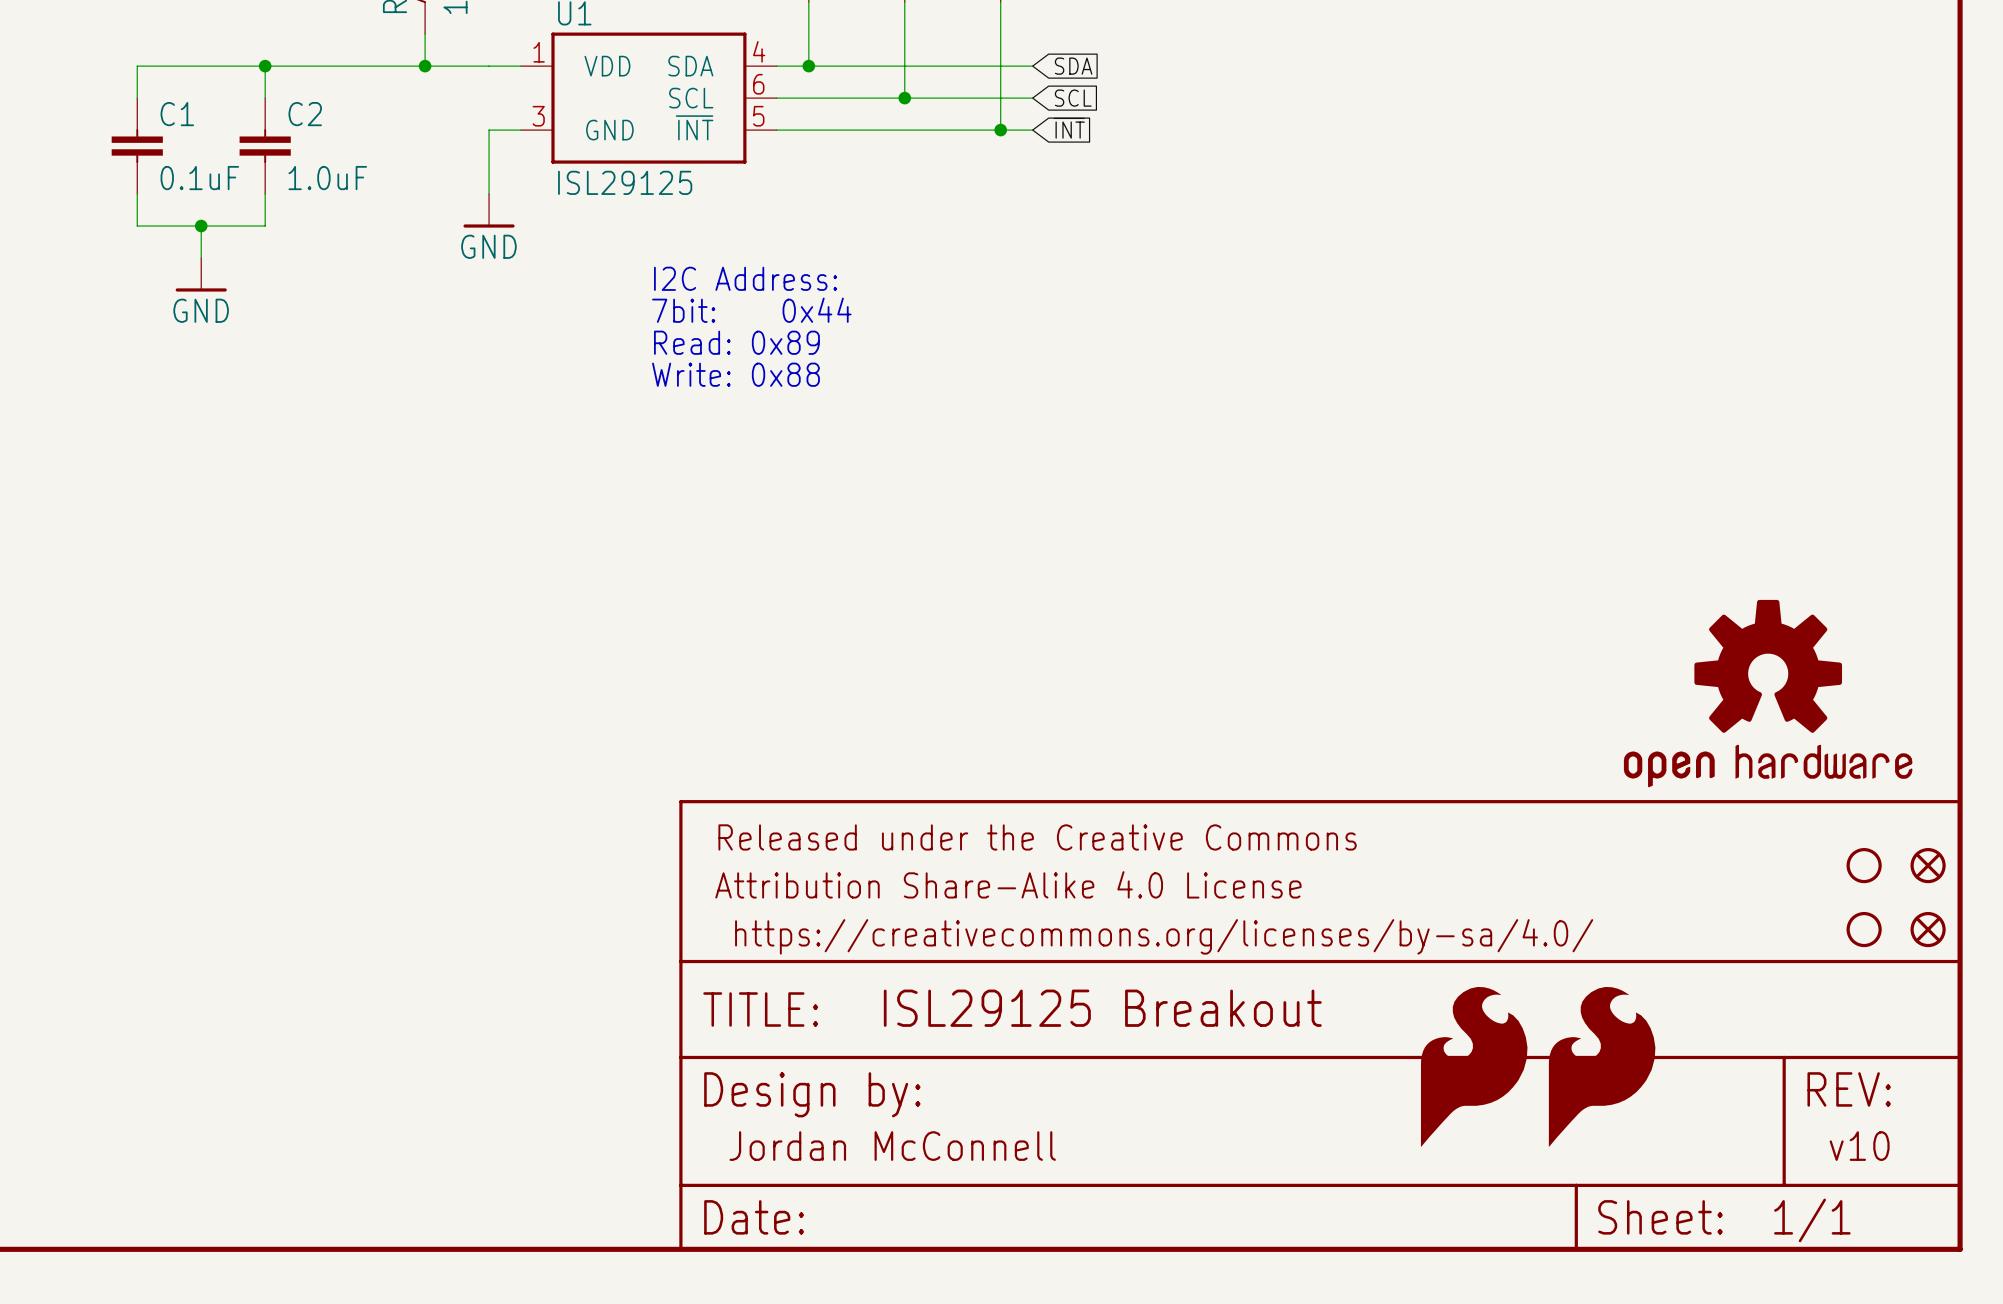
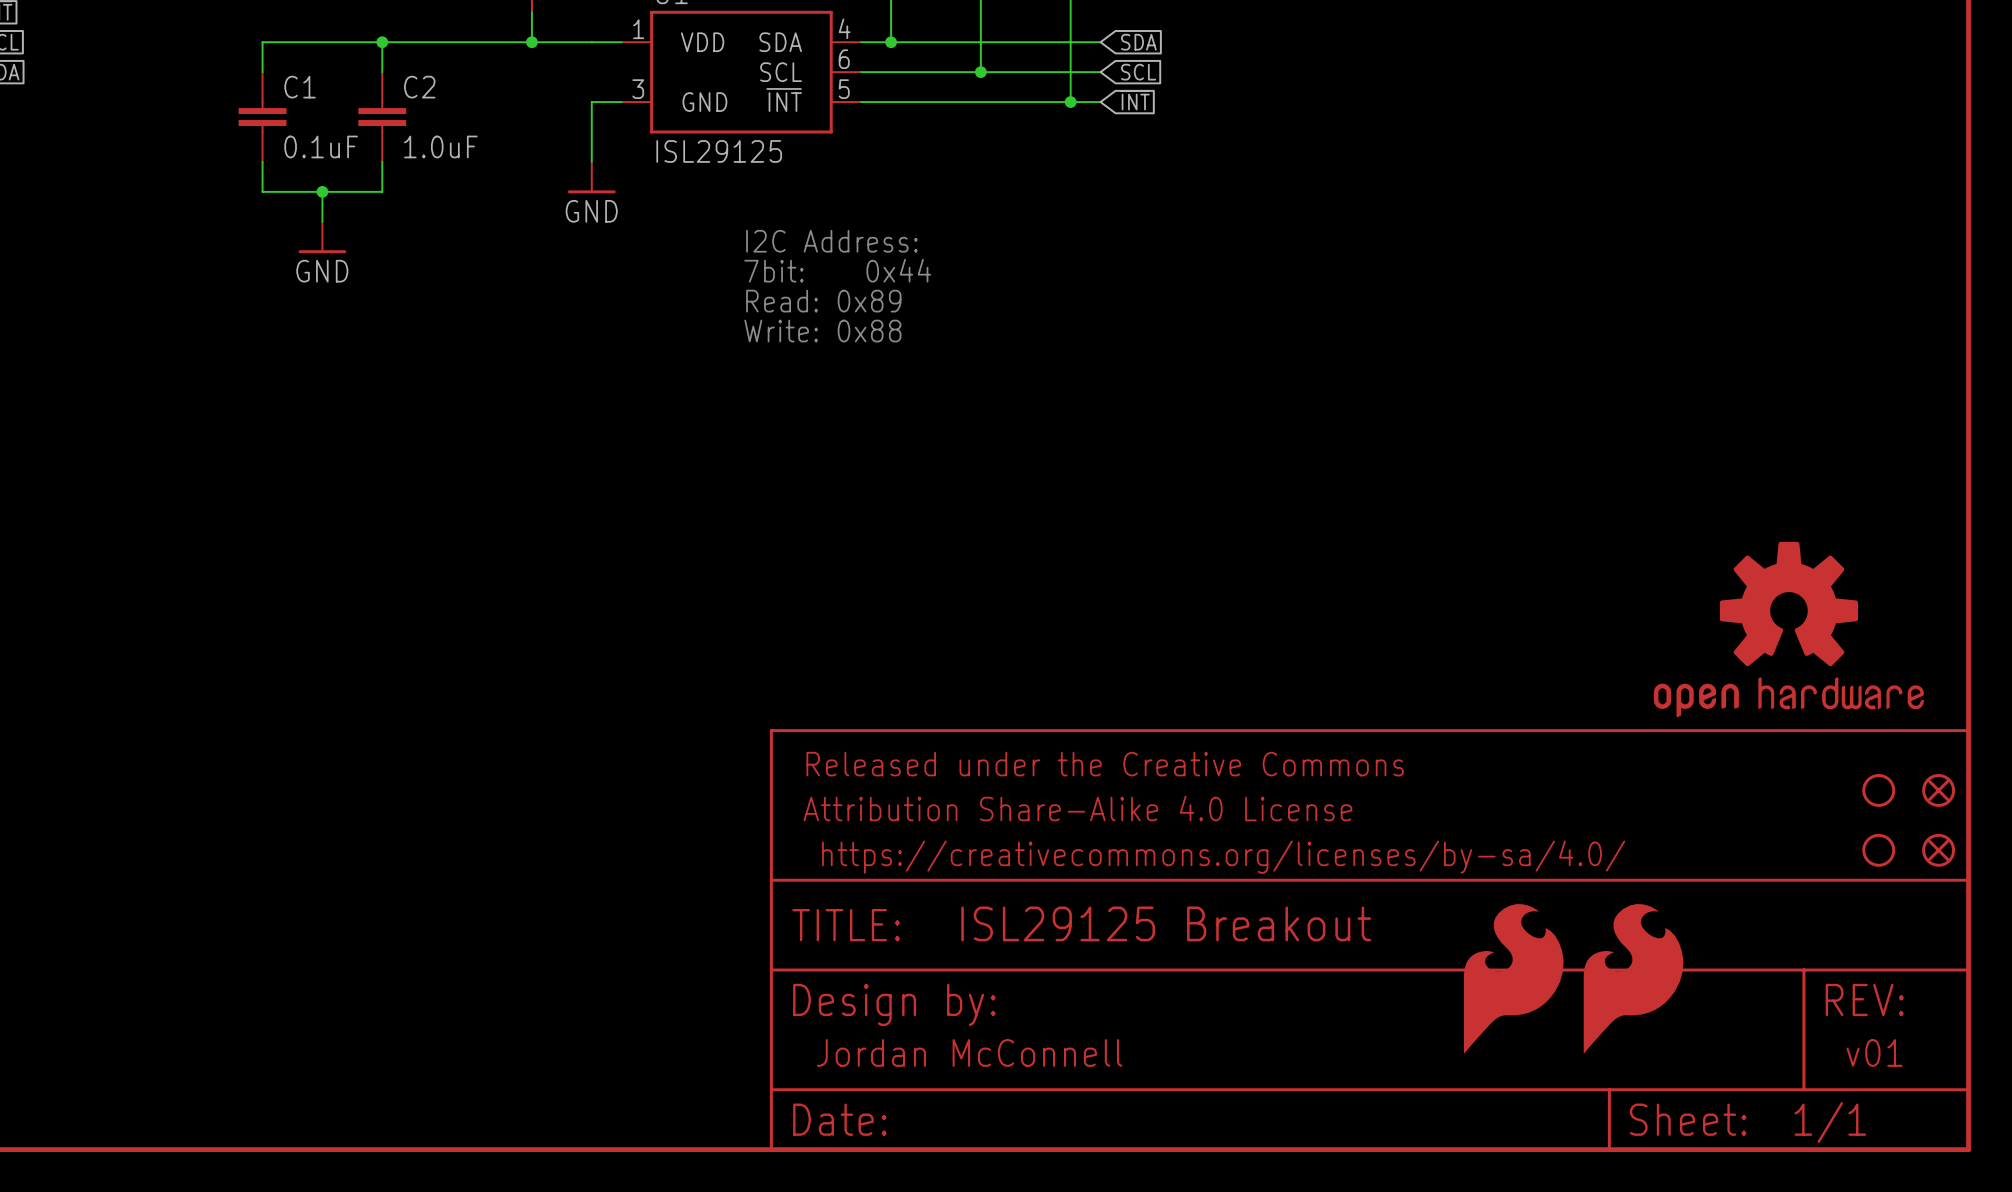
text: v10 (1859, 1146) -> v01 (1874, 1052)

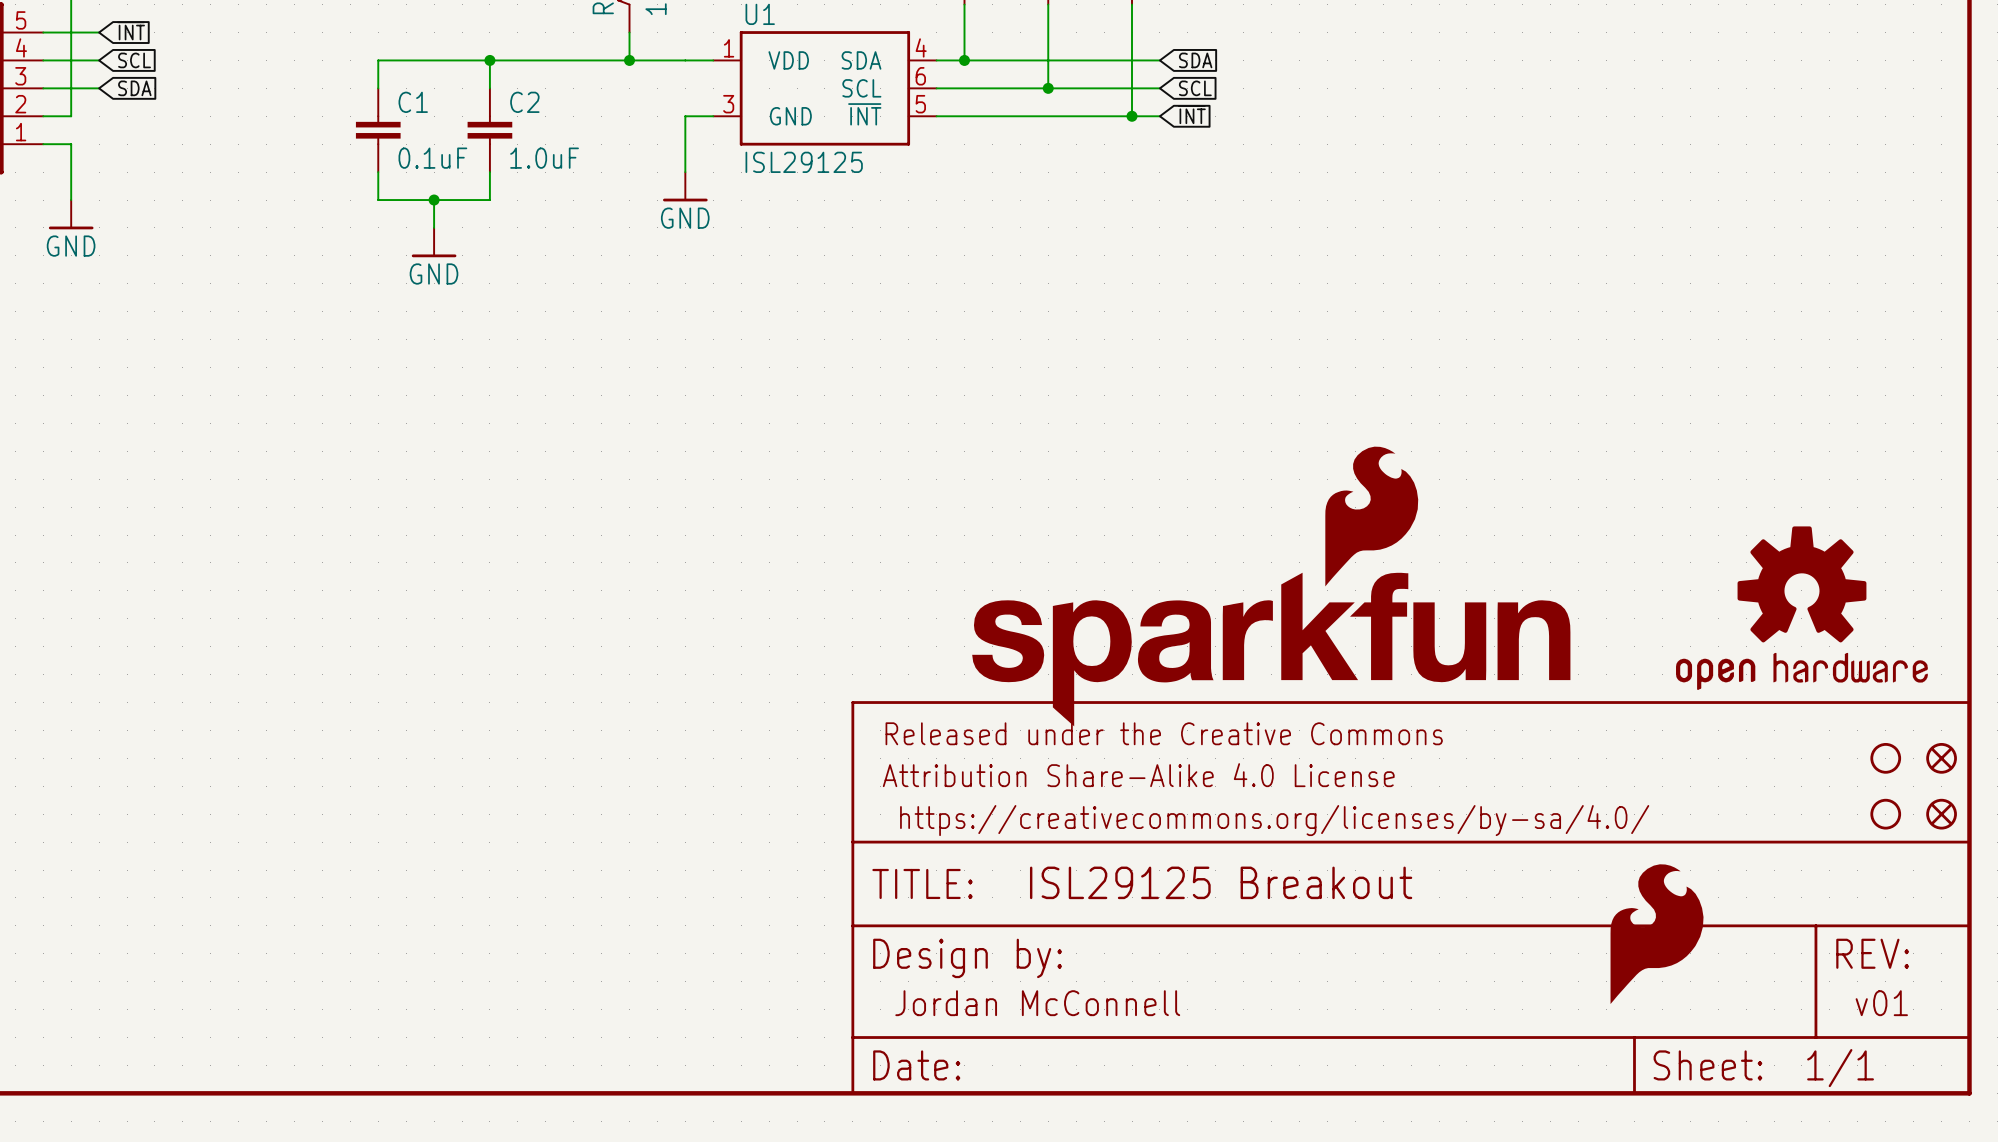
text: I2C Address: (831, 241) -> none
text: 7bit: 0x44 (837, 270) -> none
text: Read: 0x89 (823, 301) -> none
text: Write: 0x88 (822, 331) -> none
part: none -> (1271, 586)
part: (1513, 978) -> none

